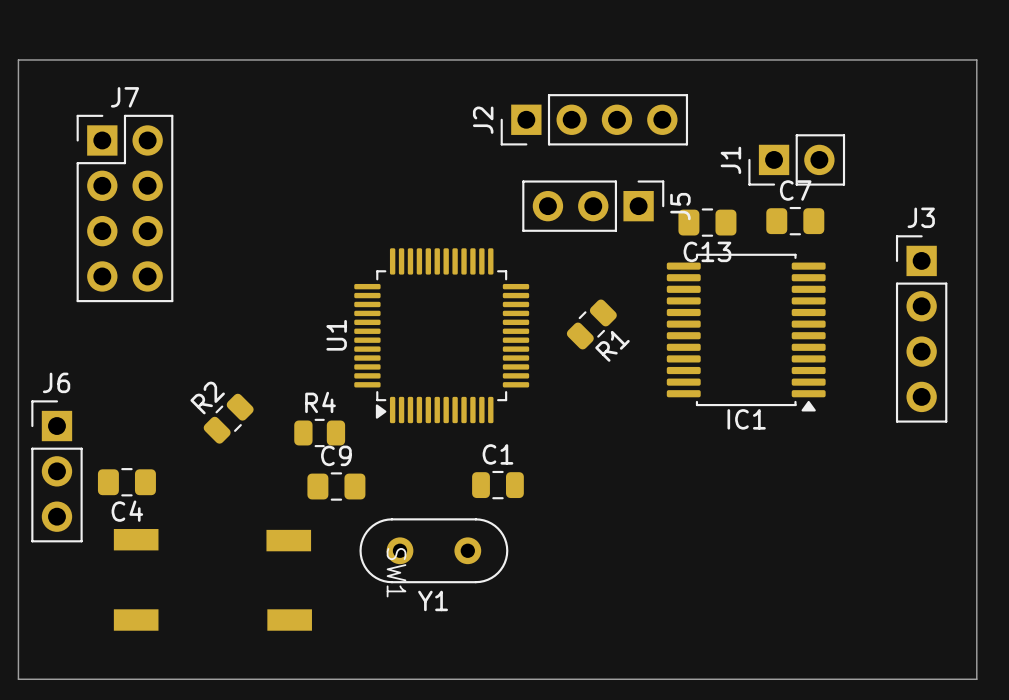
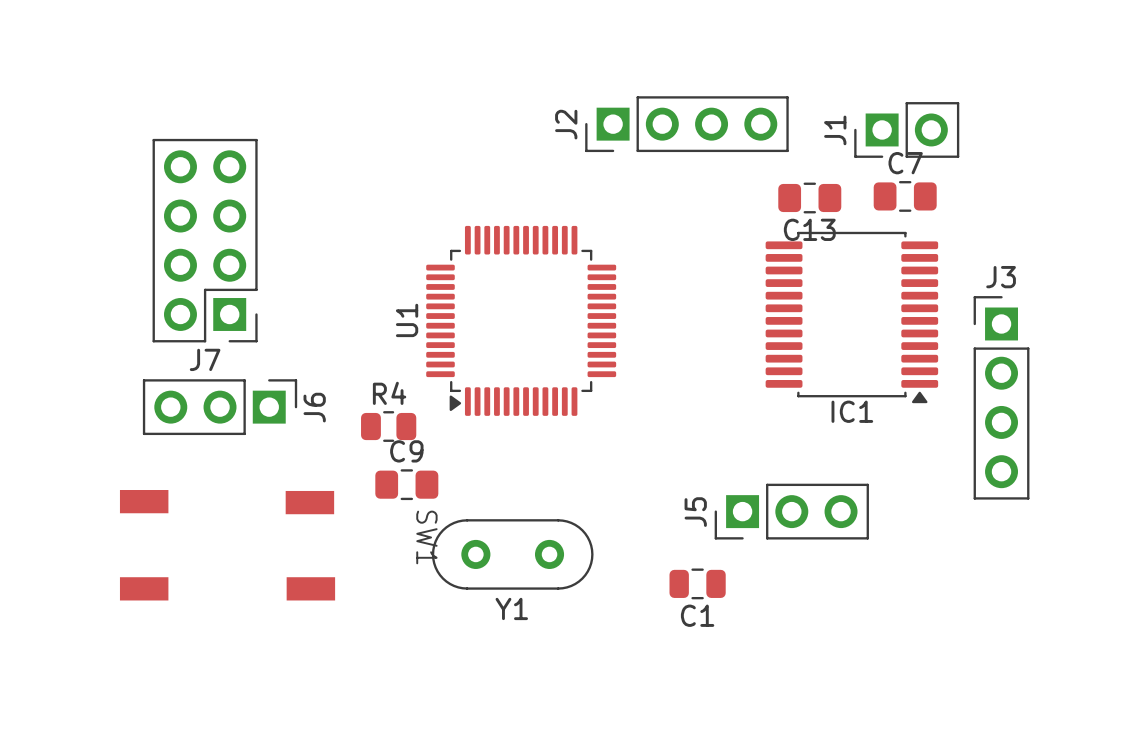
board edge: (18, 59) (976, 59) (976, 679) (18, 679) (18, 59) -> none
J2 position: (594, 119) -> (686, 124)
J5 rotation: 0° (593, 206) -> 180° (791, 511)
J5 position: (593, 206) -> (791, 511)
J7 rotation: 0° (124, 208) -> 180° (205, 240)
R1: (591, 324) -> none
J3 position: (921, 328) -> (1001, 397)
R2: (228, 418) -> none
C1 name position: C1 (497, 454) -> C1 (697, 615)
J6 rotation: 0° (56, 471) -> 90° clockwise (220, 407)
J6 position: (56, 471) -> (220, 407)
C4: (126, 482) -> none
C1 position: (497, 485) -> (697, 583)
SW1 position: (212, 579) -> (227, 545)

